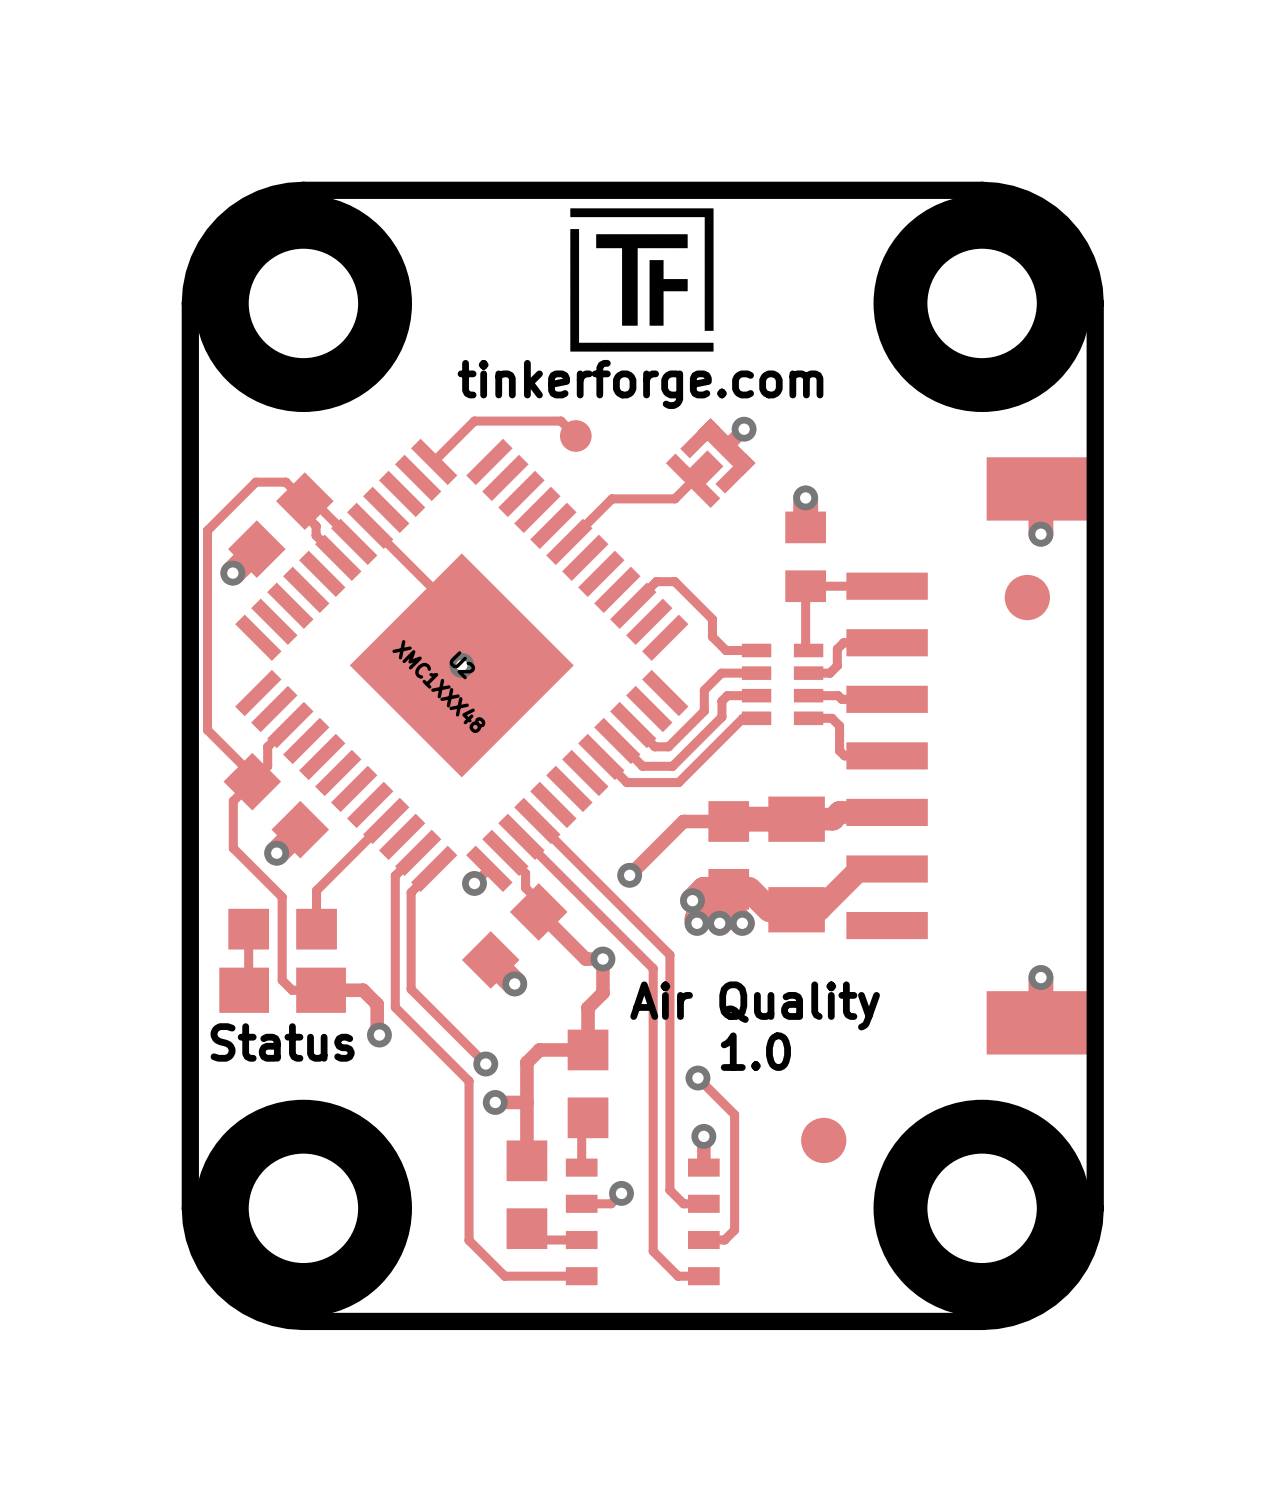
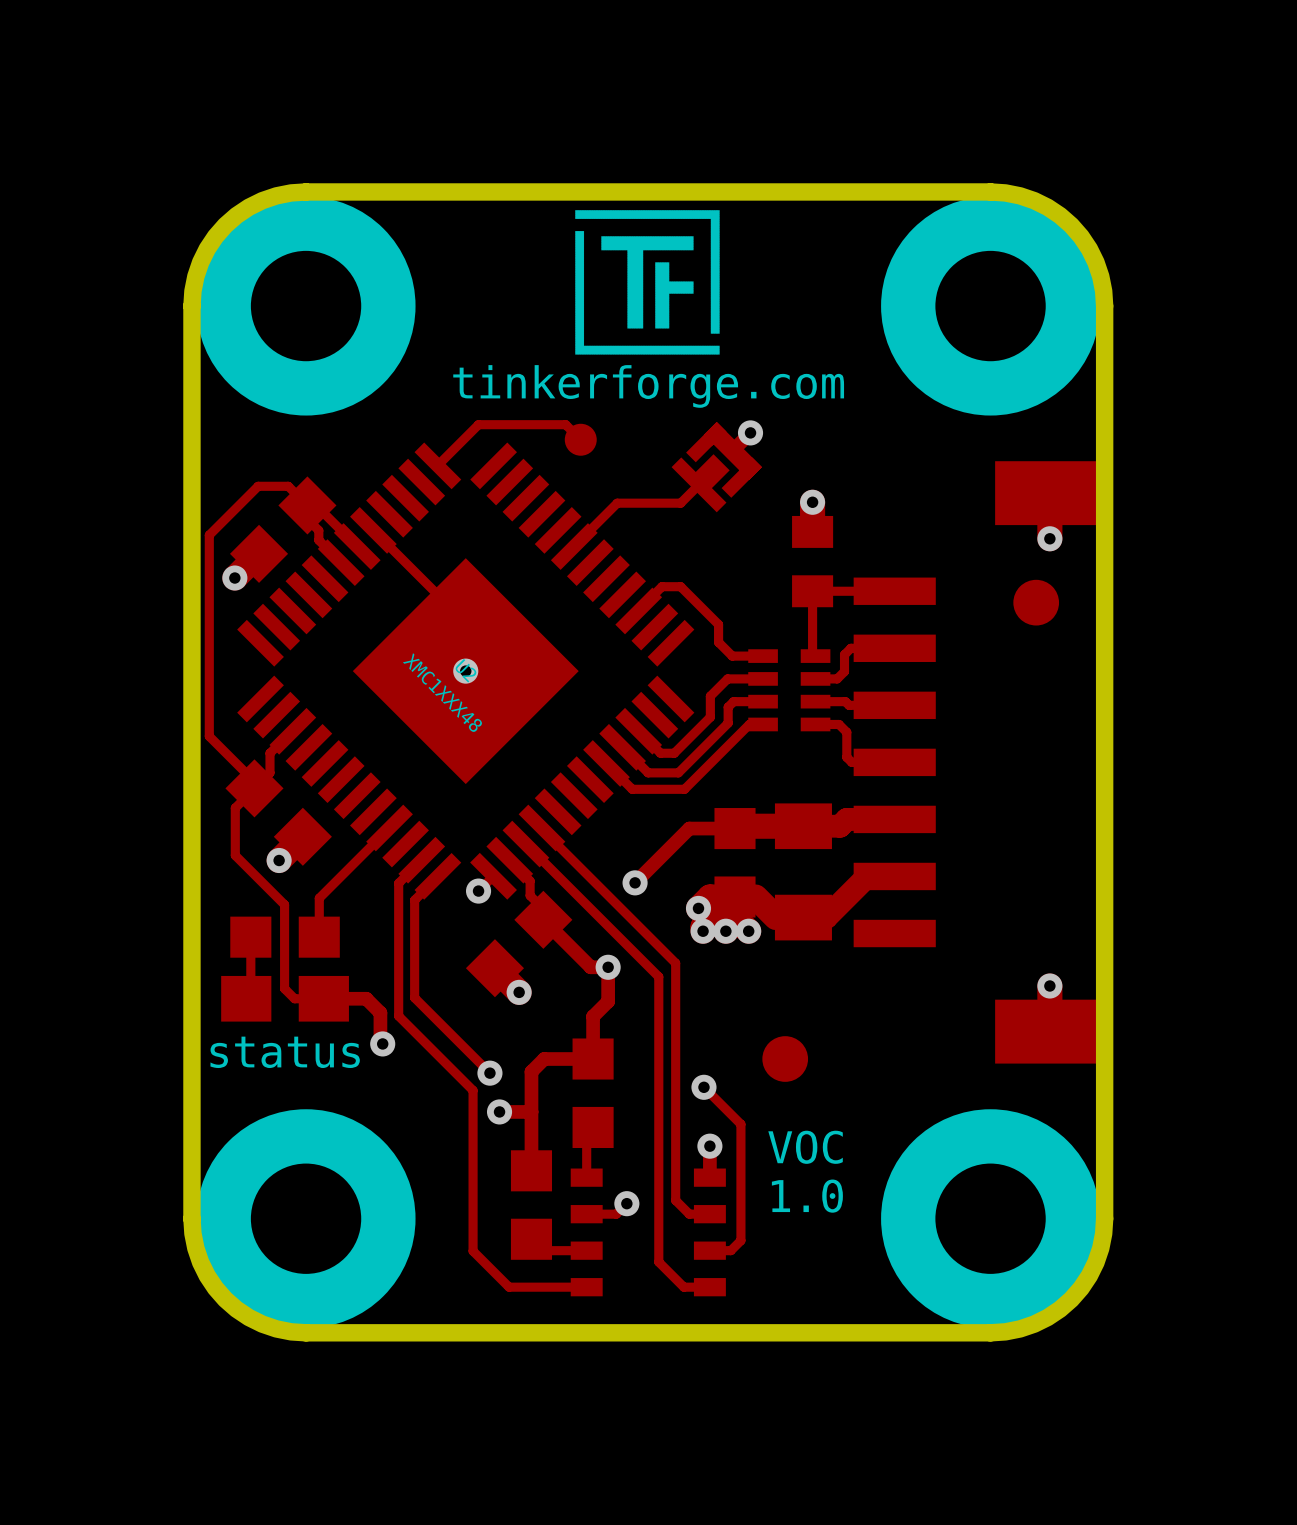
text: Air Quality (755, 1005) -> none
text: Status (282, 1042) -> status (285, 1052)
text position: 1.0 (755, 1051) -> 1.0 (807, 1196)
text: none -> VOC (805, 1147)
part position: (823, 1140) -> (785, 1059)

